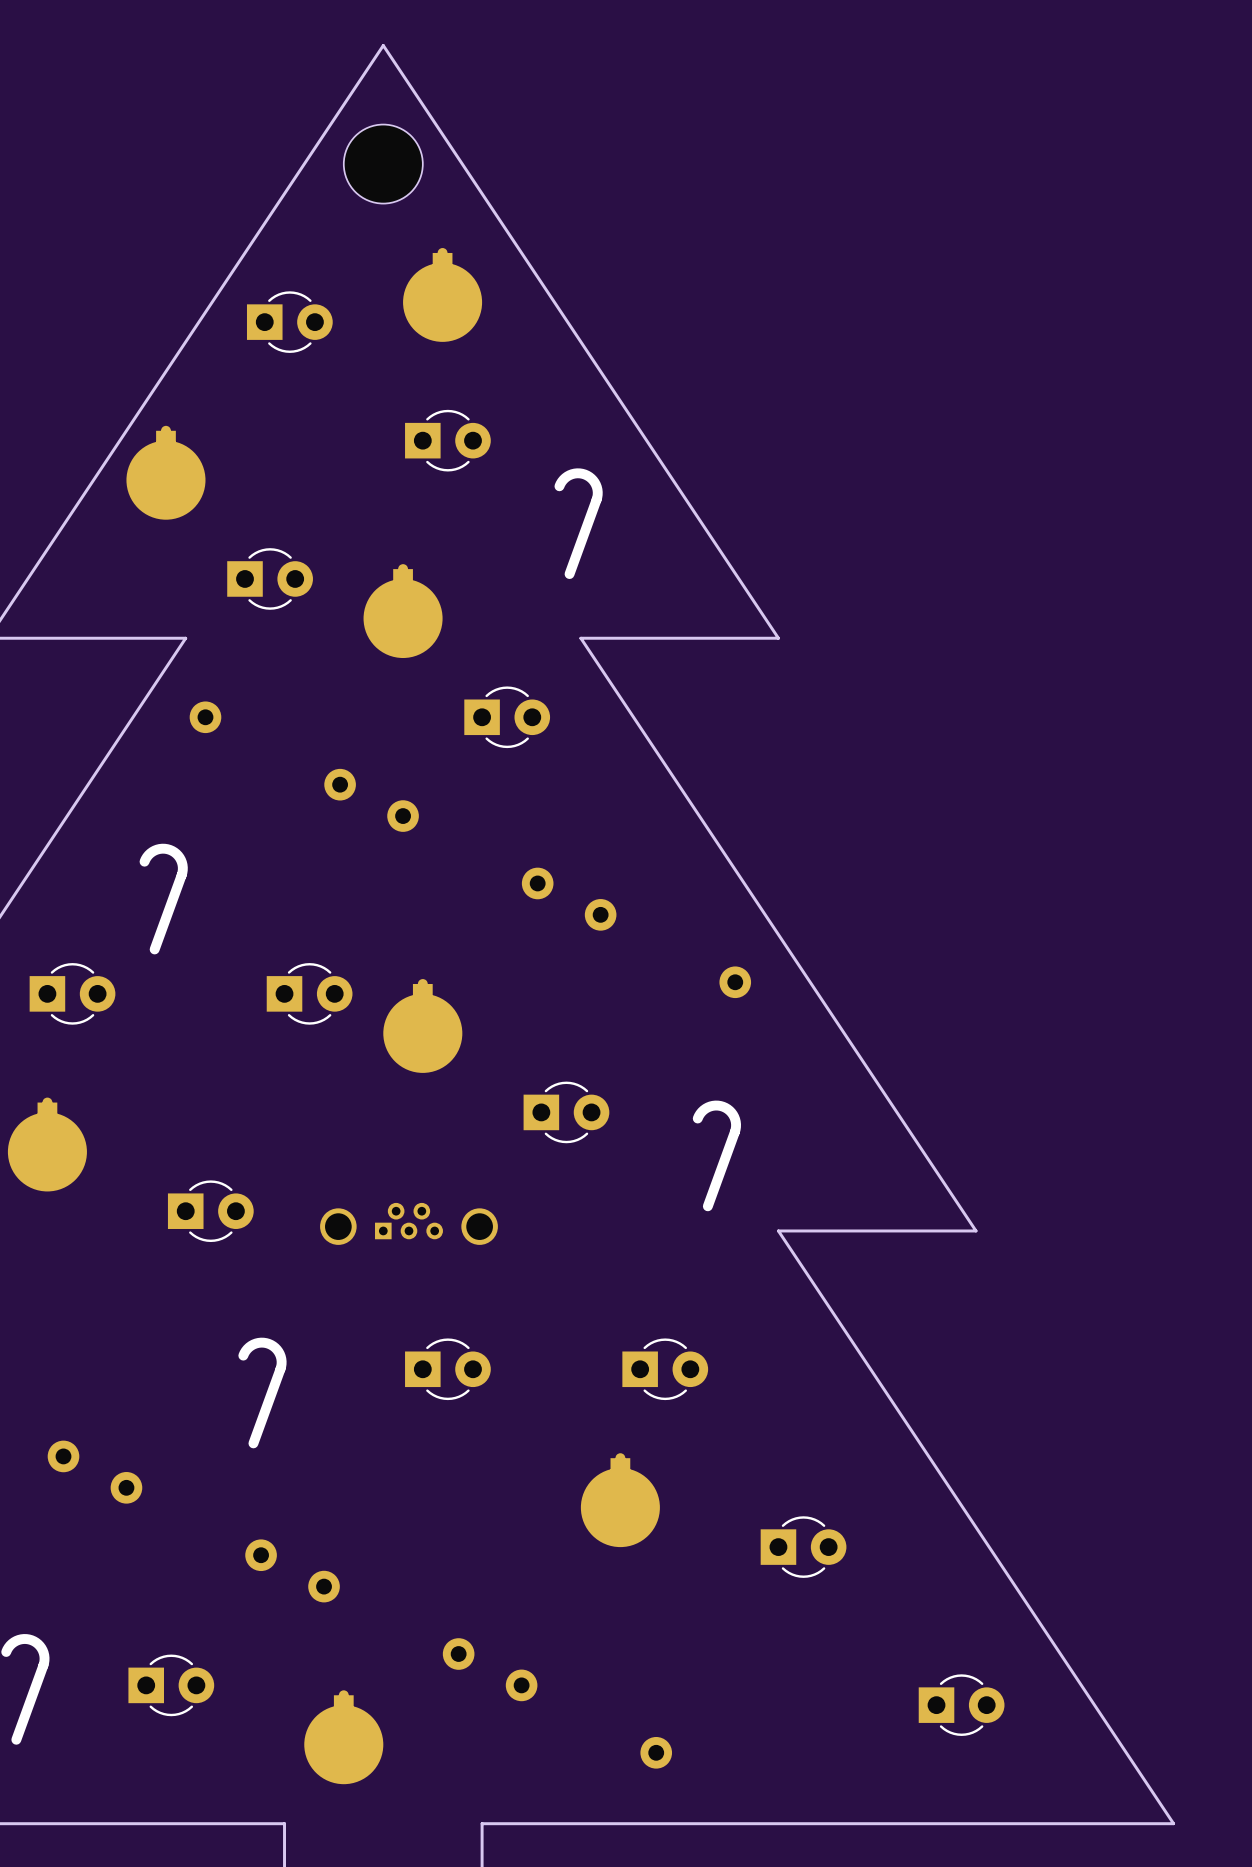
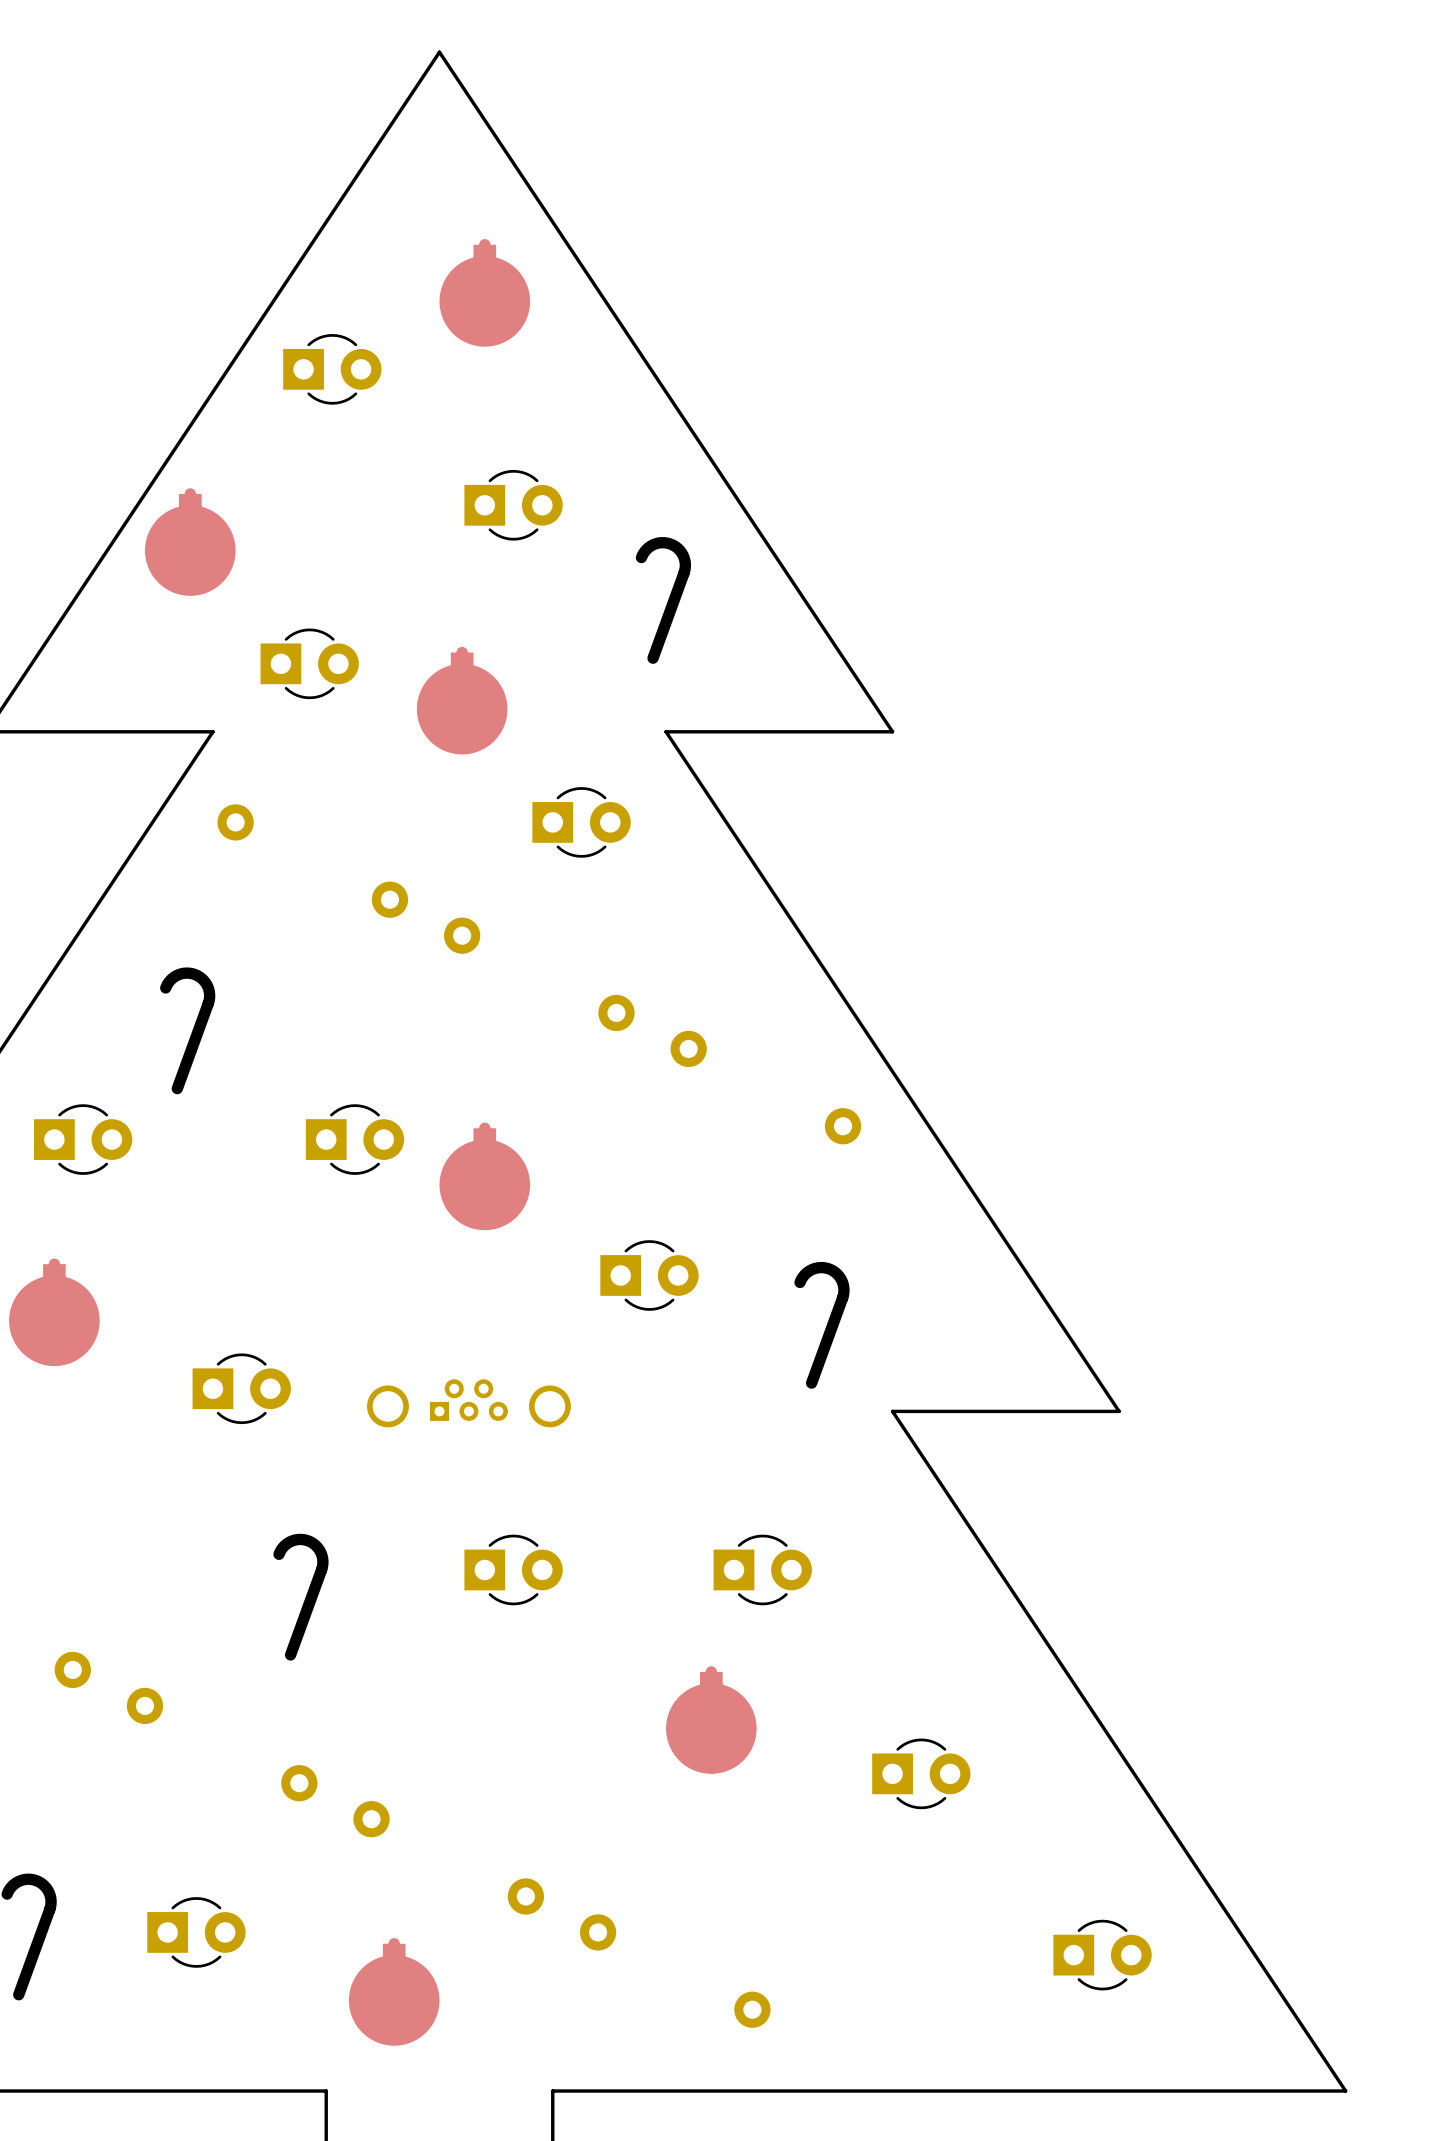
part: (383, 164) -> none
part position: (442, 294) -> (484, 292)

